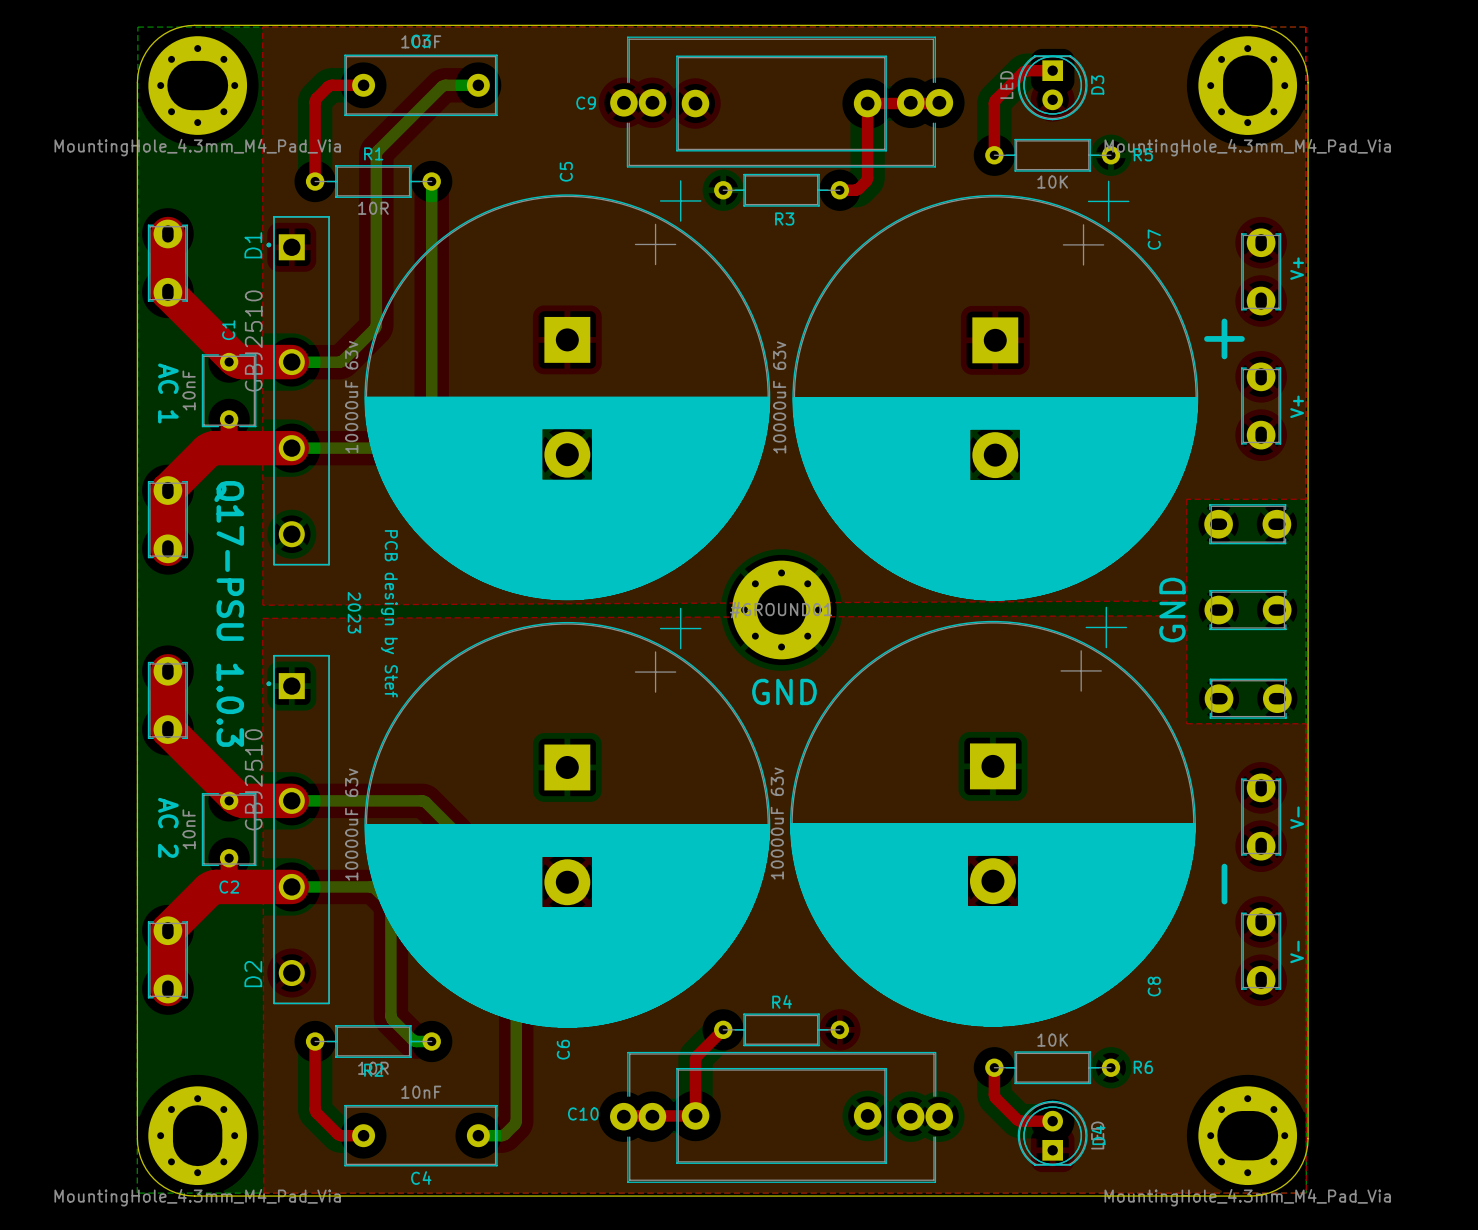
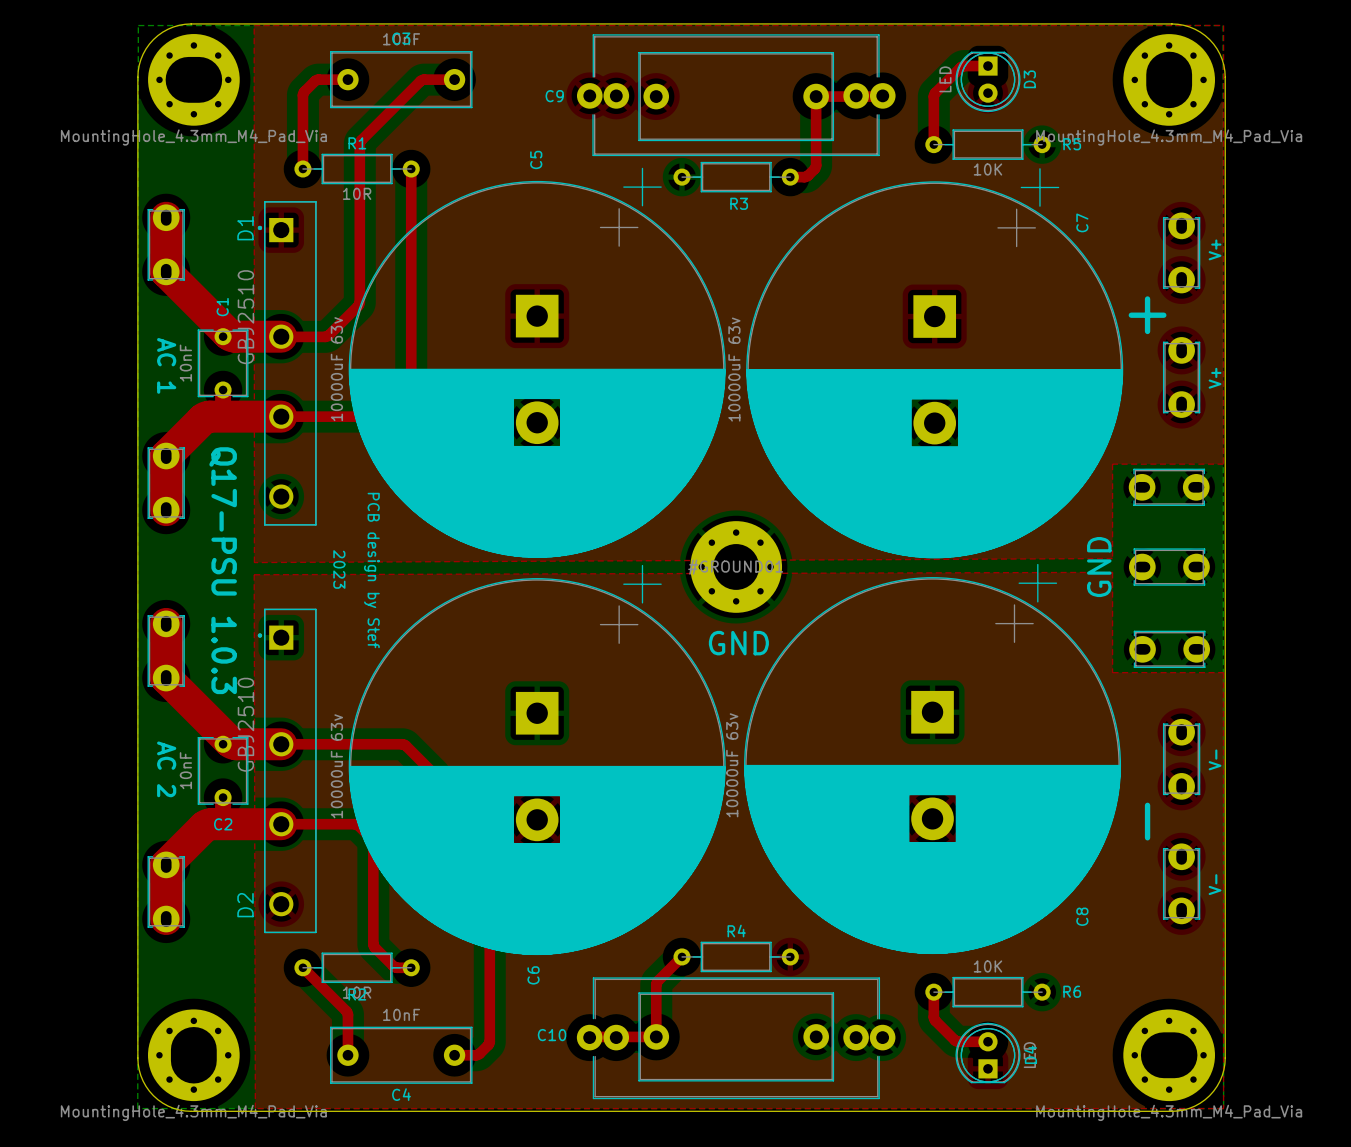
top track: none -> (454, 79) (421, 80) (360, 142) (358, 305) (327, 336) (281, 336)
bottom track: (478, 85) (442, 86) (376, 152) (375, 328) (341, 361) (291, 362) -> none
top track: none -> (411, 168) (410, 383) (376, 416) (281, 416)
bottom track: (431, 181) (431, 412) (394, 447) (291, 448) -> none
top track: none -> (281, 744) (403, 744) (434, 775) (436, 837) (489, 893) (489, 1042) (477, 1054) (454, 1055)
bottom track: (291, 800) (423, 800) (457, 834) (458, 901) (516, 961) (516, 1121) (503, 1135) (478, 1135) -> none
top track: none -> (281, 824) (355, 824) (371, 838) (373, 945) (394, 967) (411, 967)
bottom track: (291, 886) (372, 887) (389, 902) (390, 906) (391, 1017) (413, 1040) (431, 1041) -> none
top track: (315, 1041) (315, 1111) (338, 1134) (363, 1135) -> (302, 967) (347, 1012) (347, 1055)

